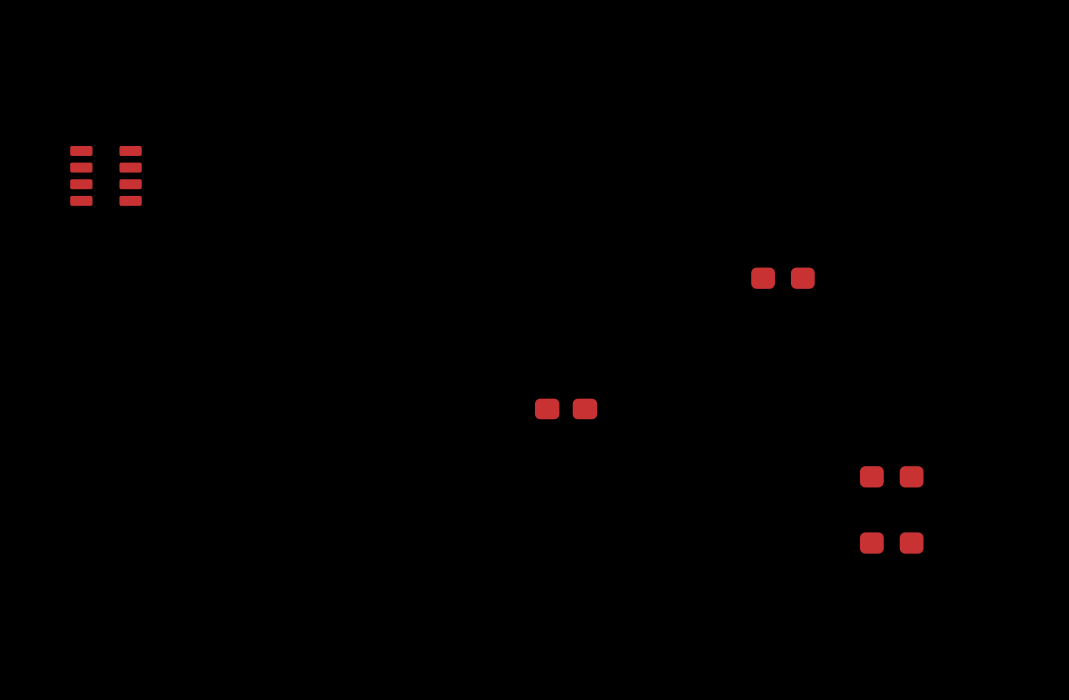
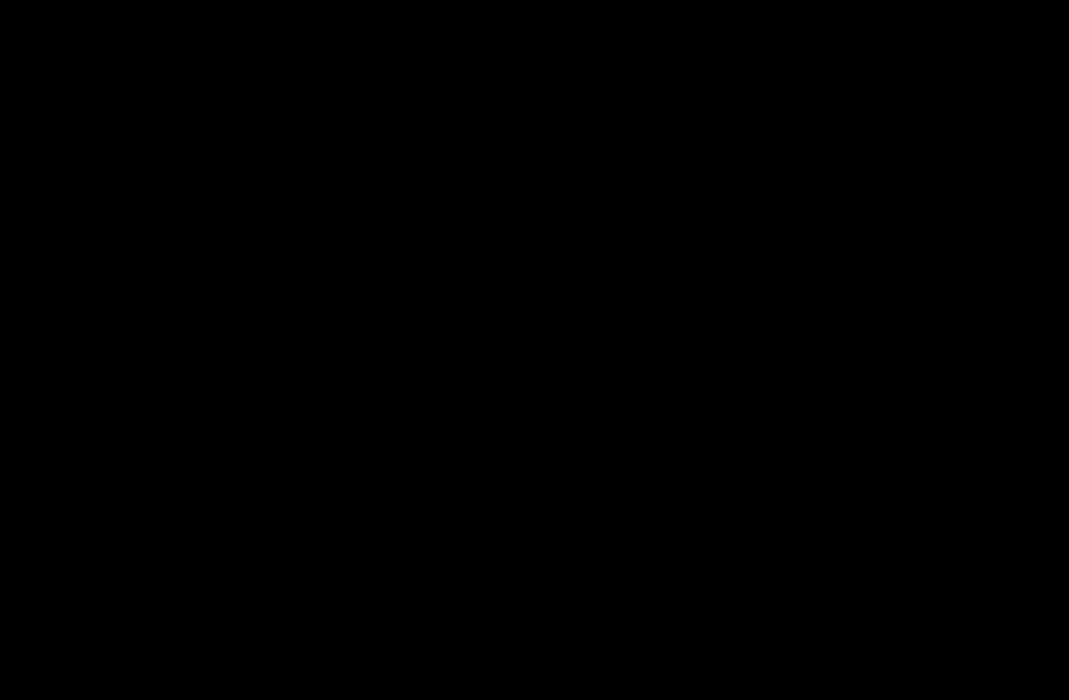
part: (105, 175) -> none
part: (782, 278) -> none
part: (566, 408) -> none
part: (891, 476) -> none
part: (891, 543) -> none

